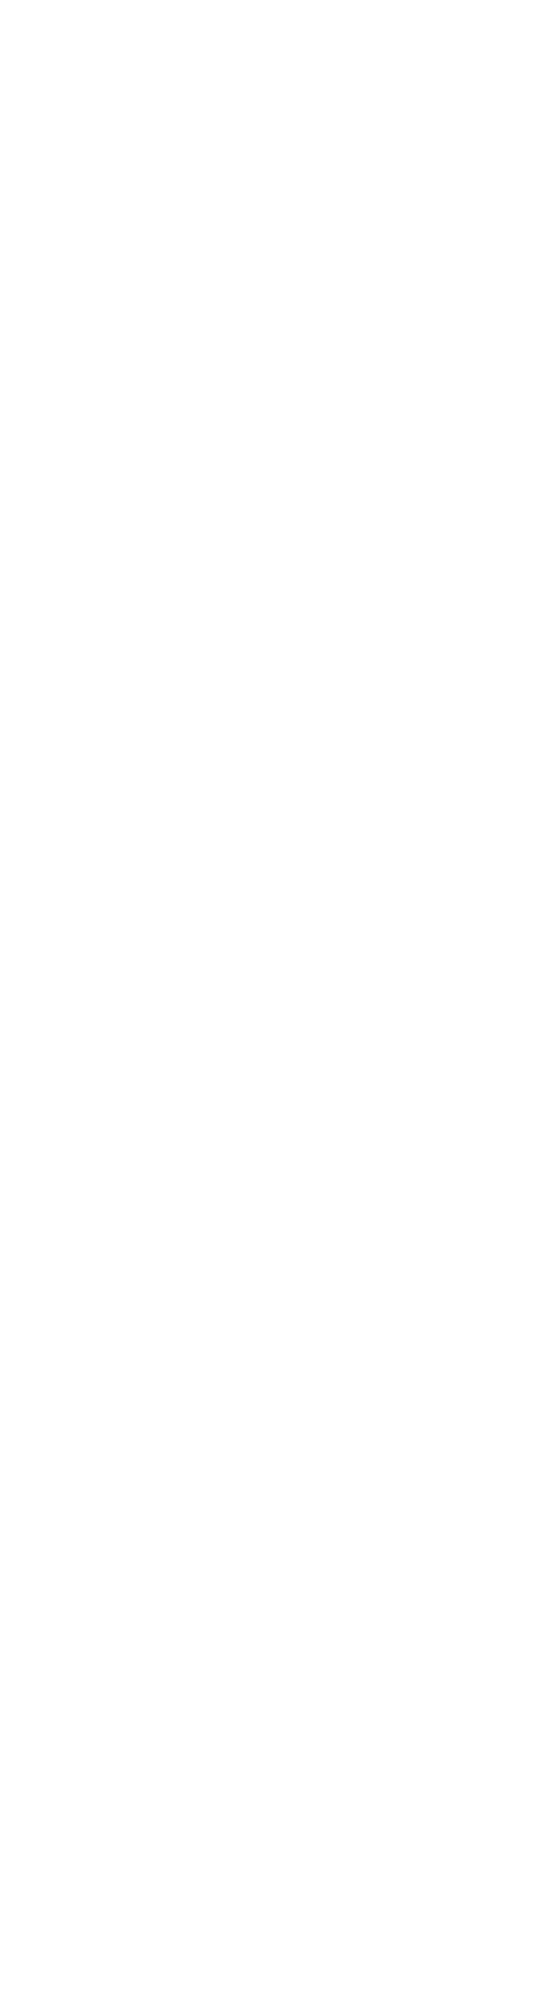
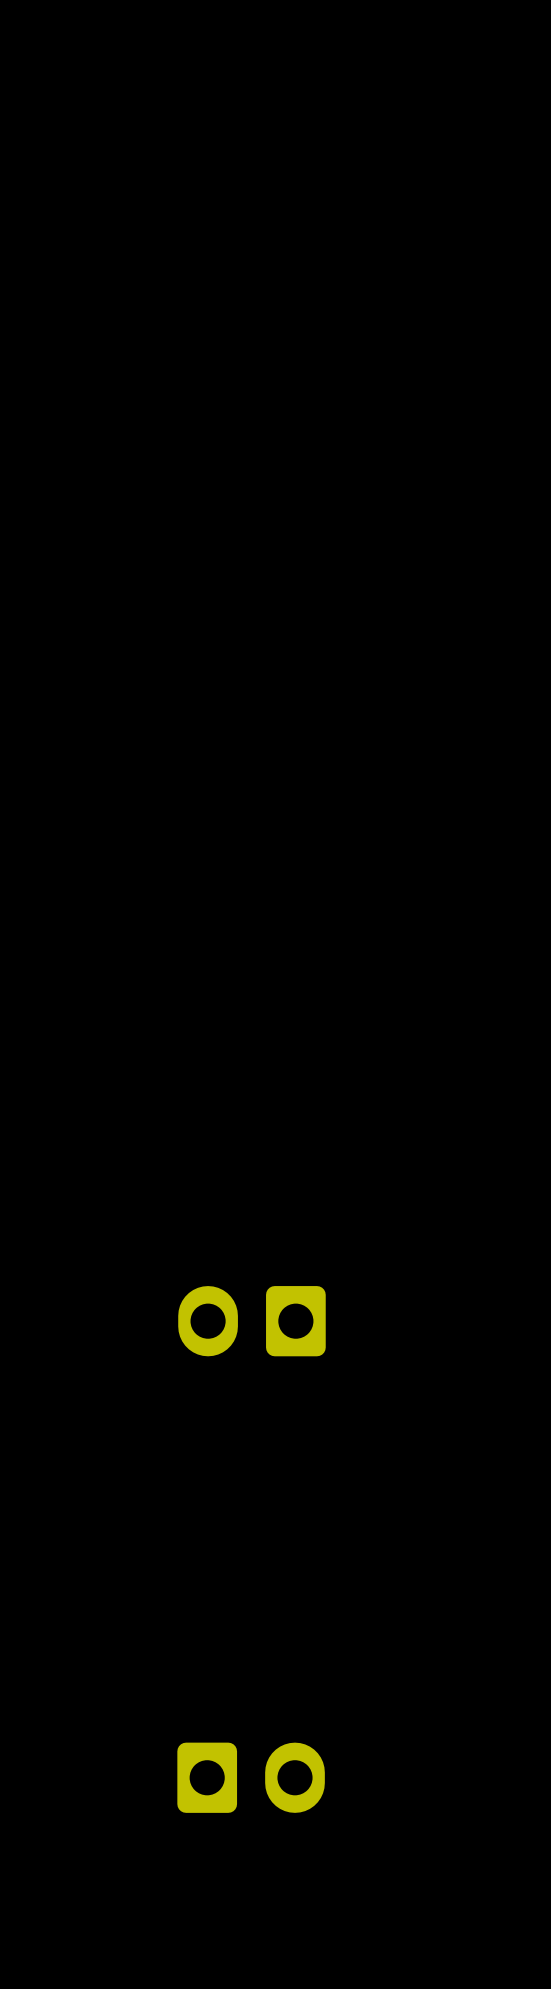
part: none -> (251, 1321)
part: none -> (251, 1777)

